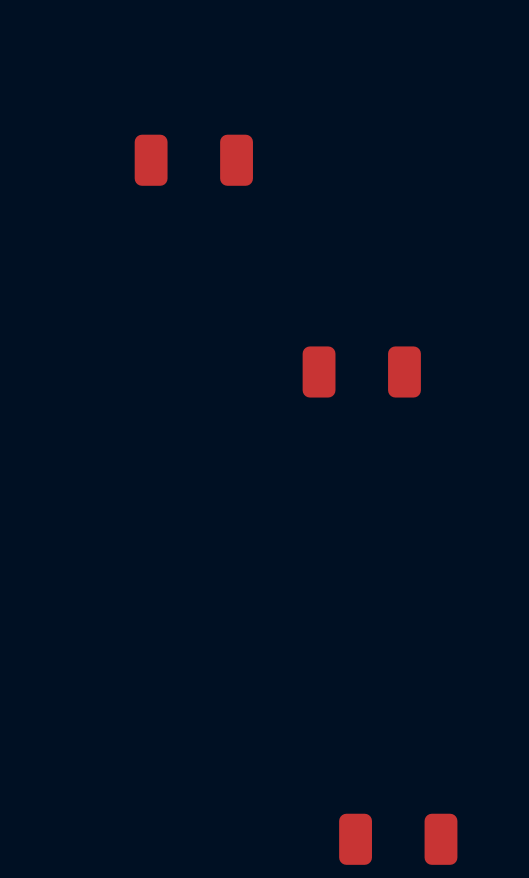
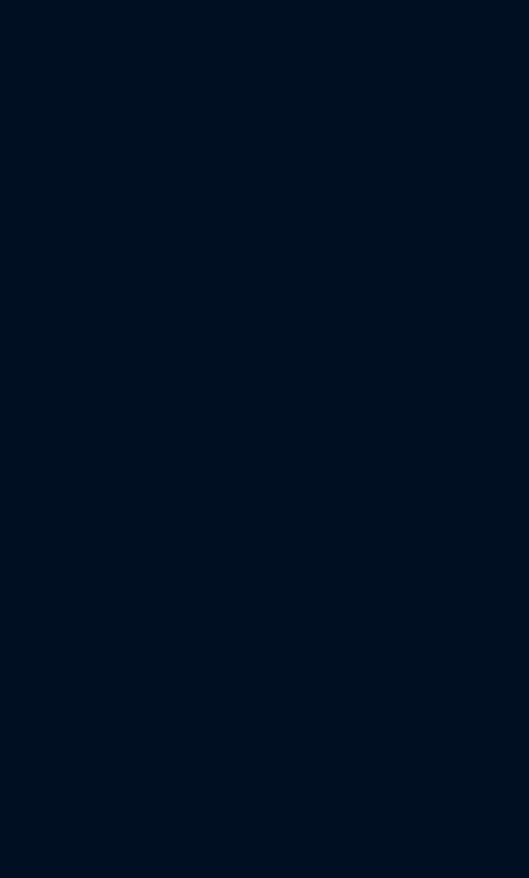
part: (193, 160) -> none
part: (361, 371) -> none
part: (398, 839) -> none

